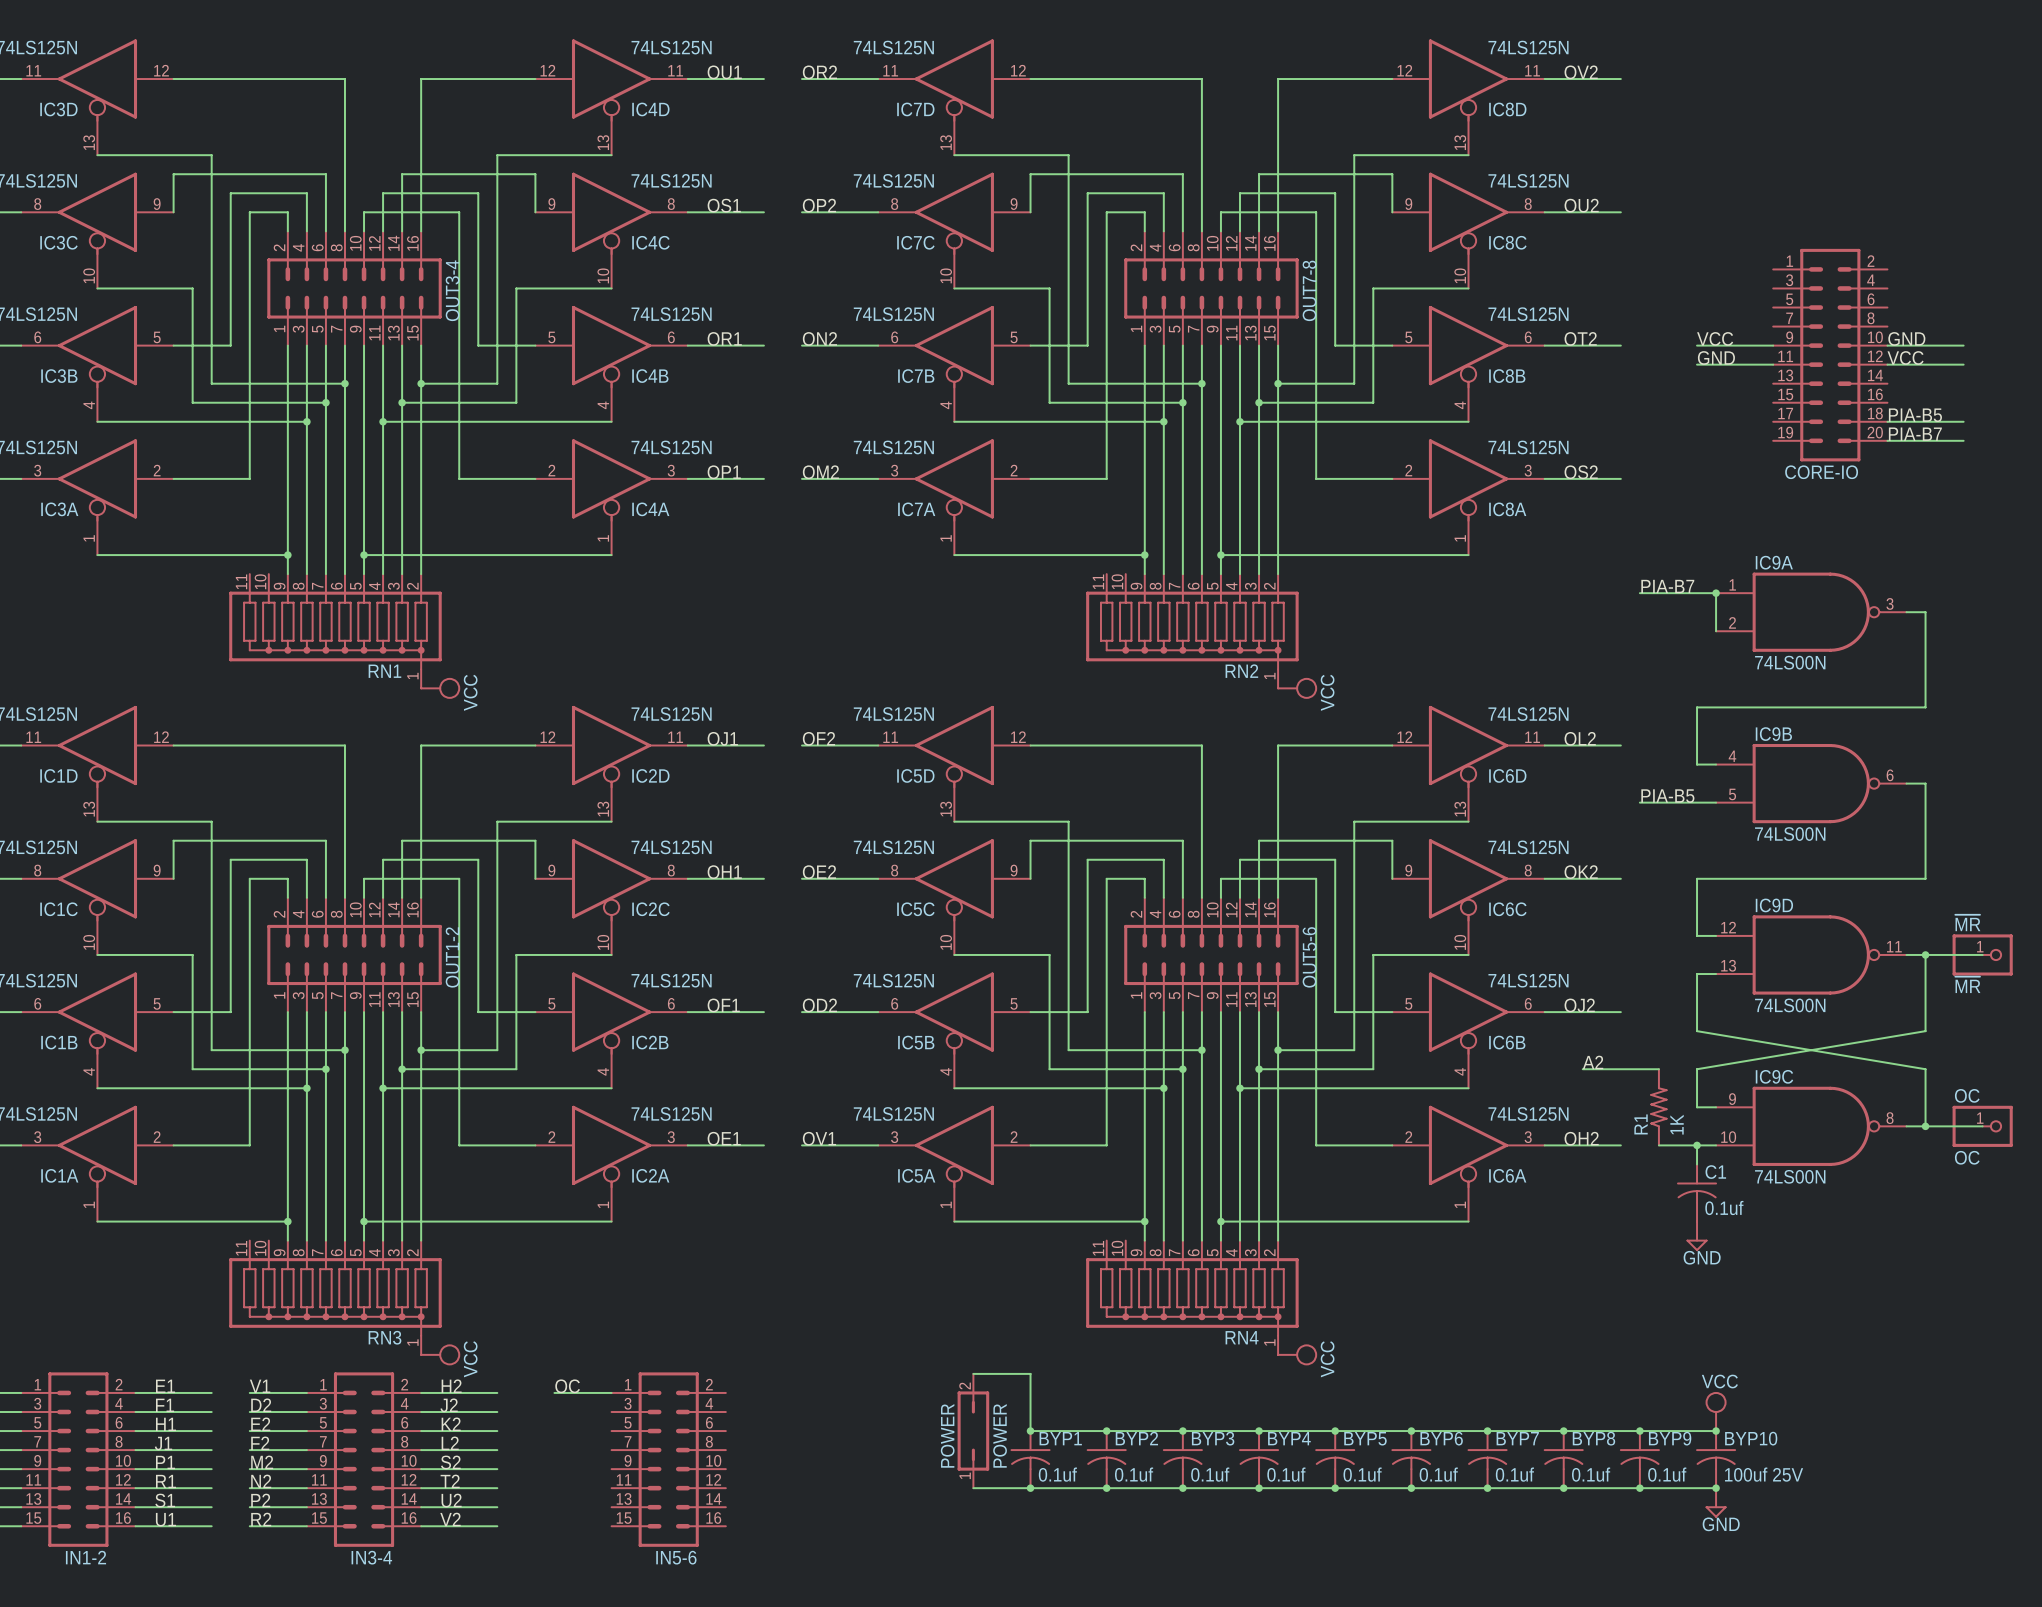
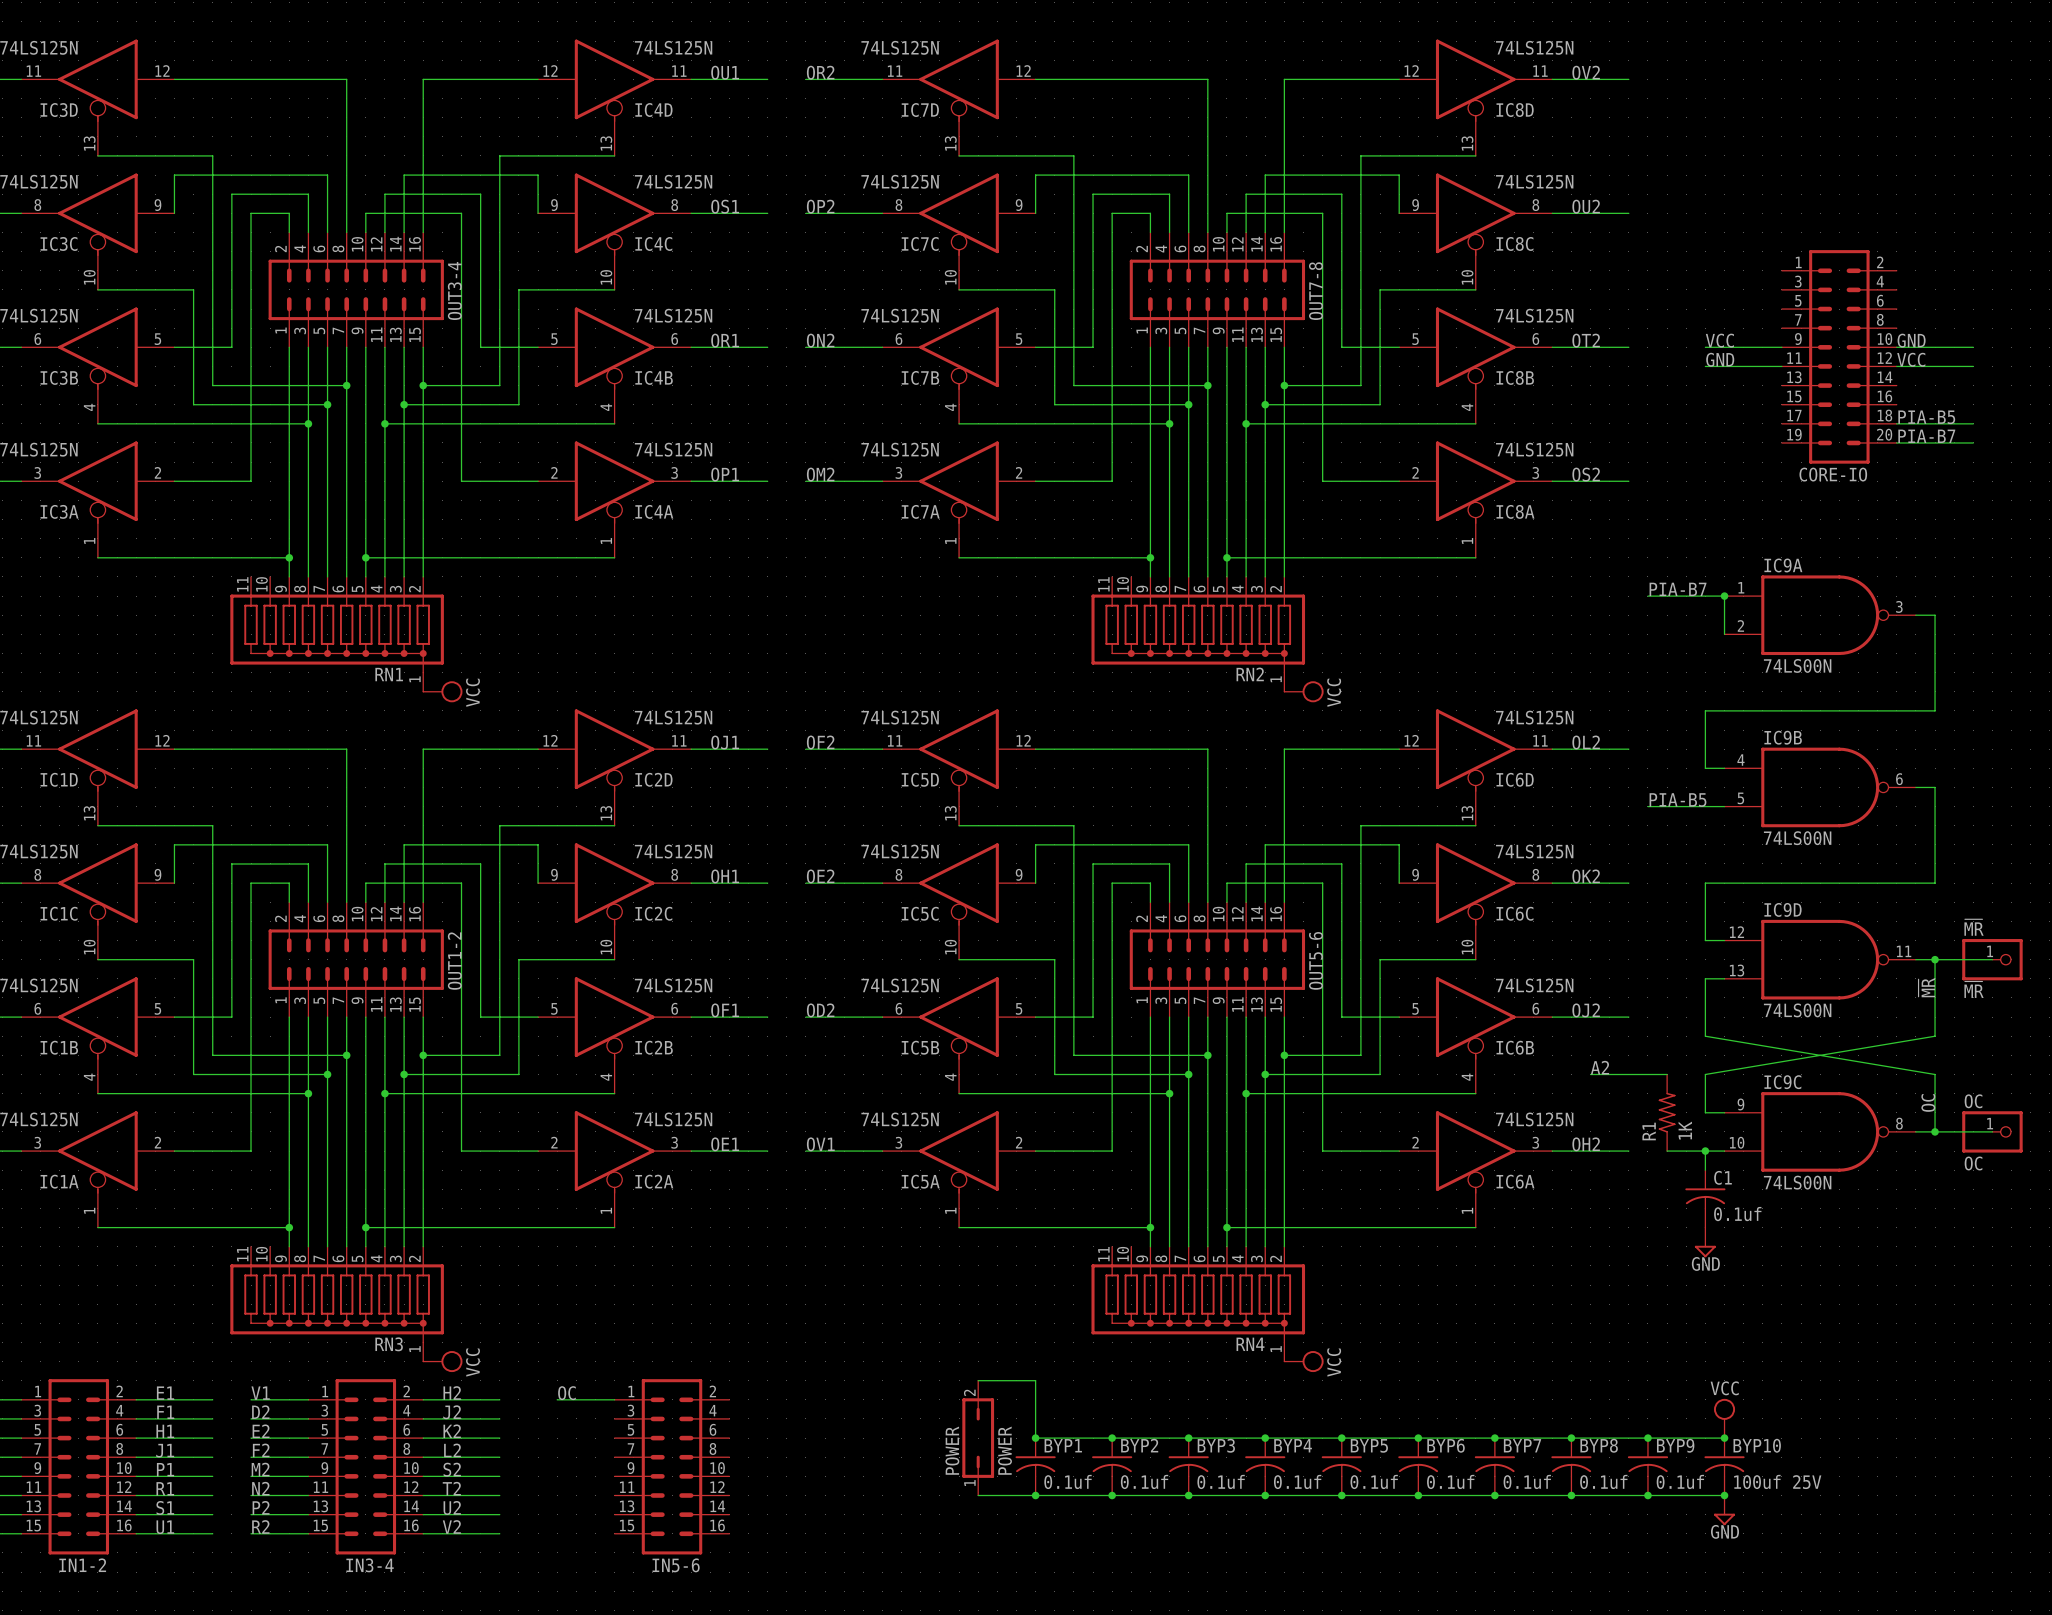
label: none -> ~{MR} (1926, 987)
label: none -> OC (1928, 1102)

